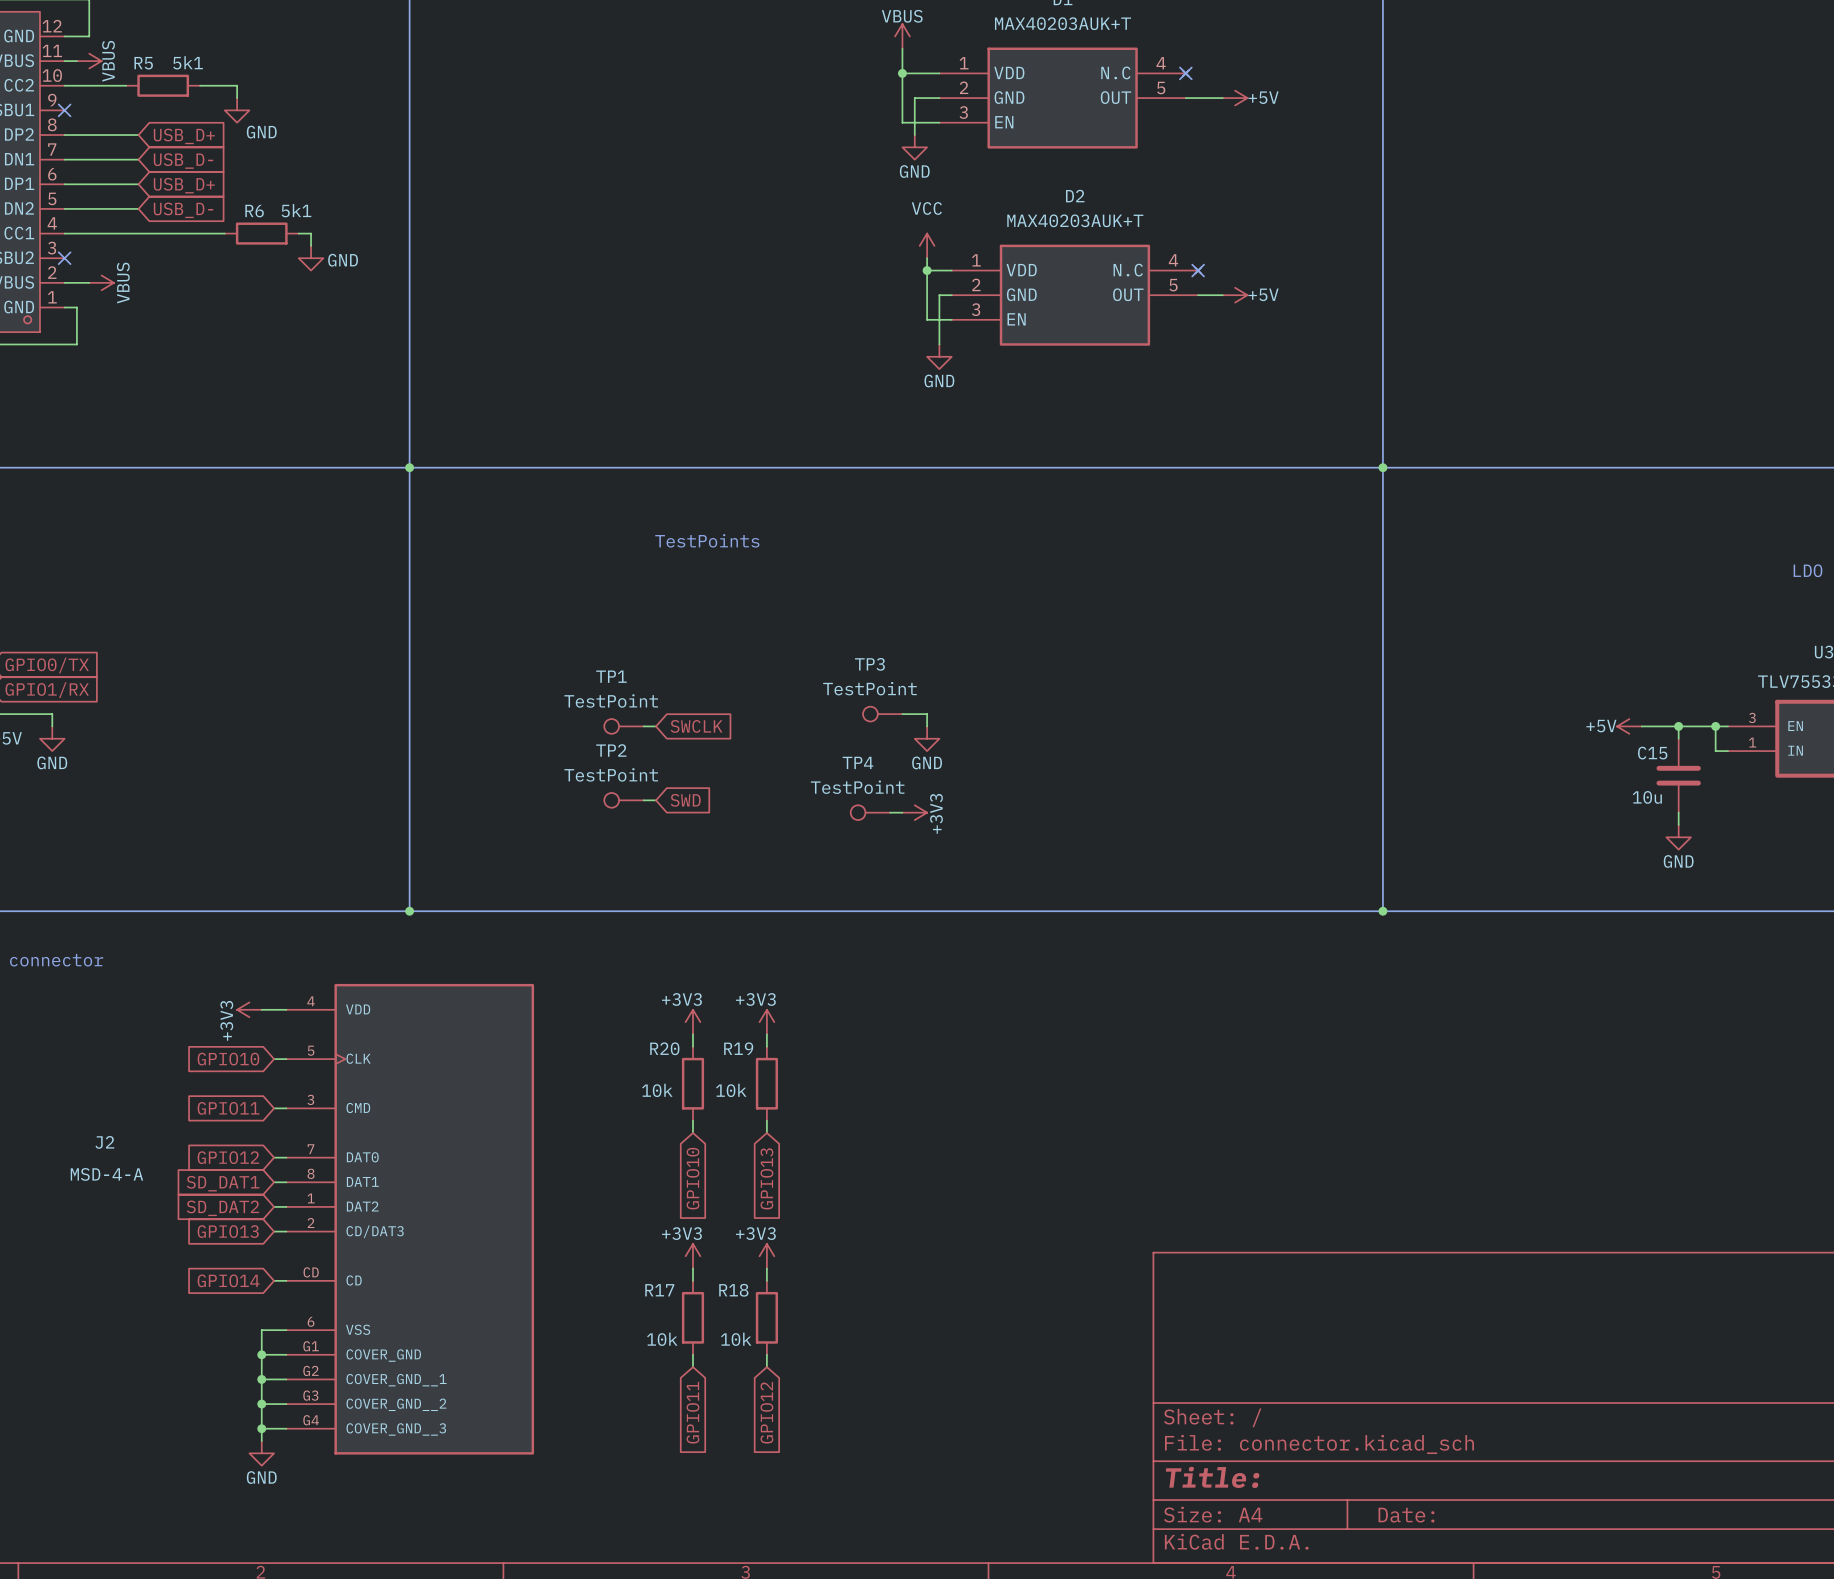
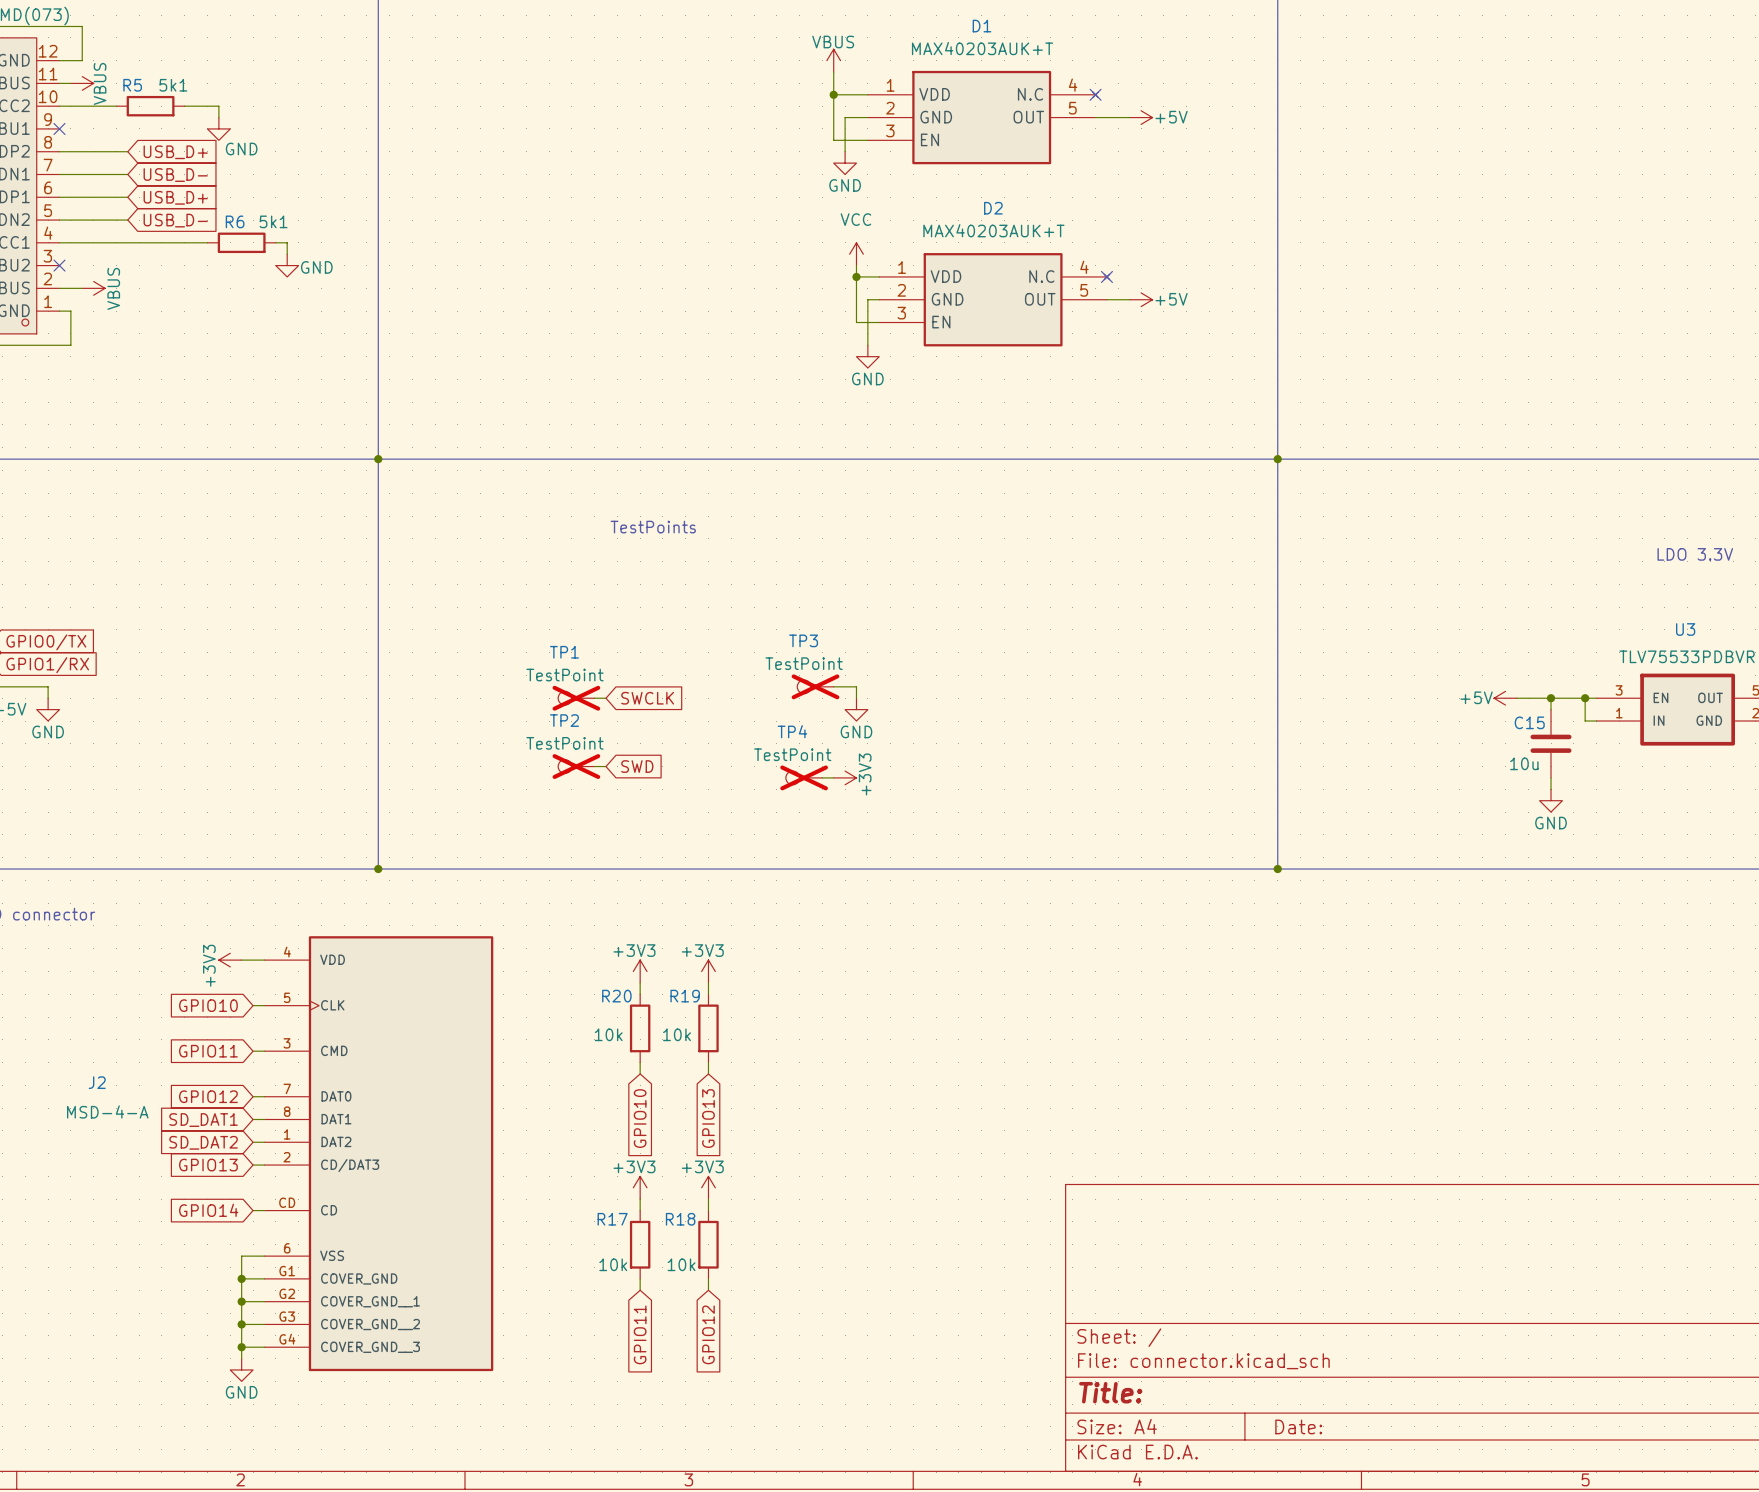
TP3 do-not-place cross: none -> (815, 686)
TP1 do-not-place cross: none -> (576, 698)
TP2 do-not-place cross: none -> (576, 766)
TP4 do-not-place cross: none -> (804, 777)

